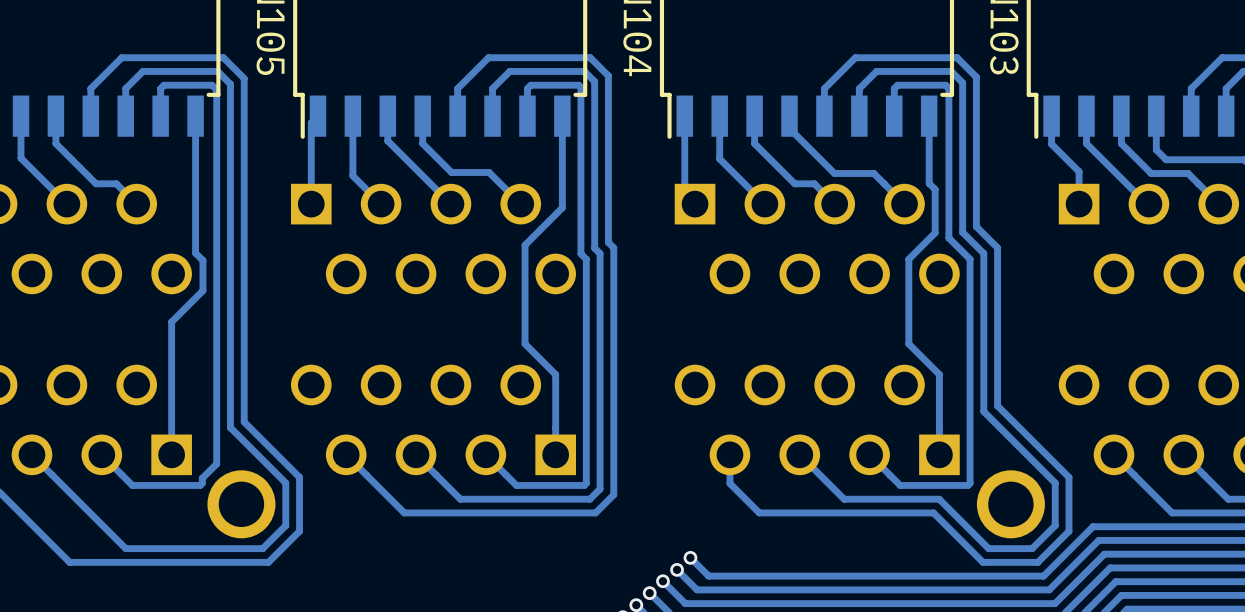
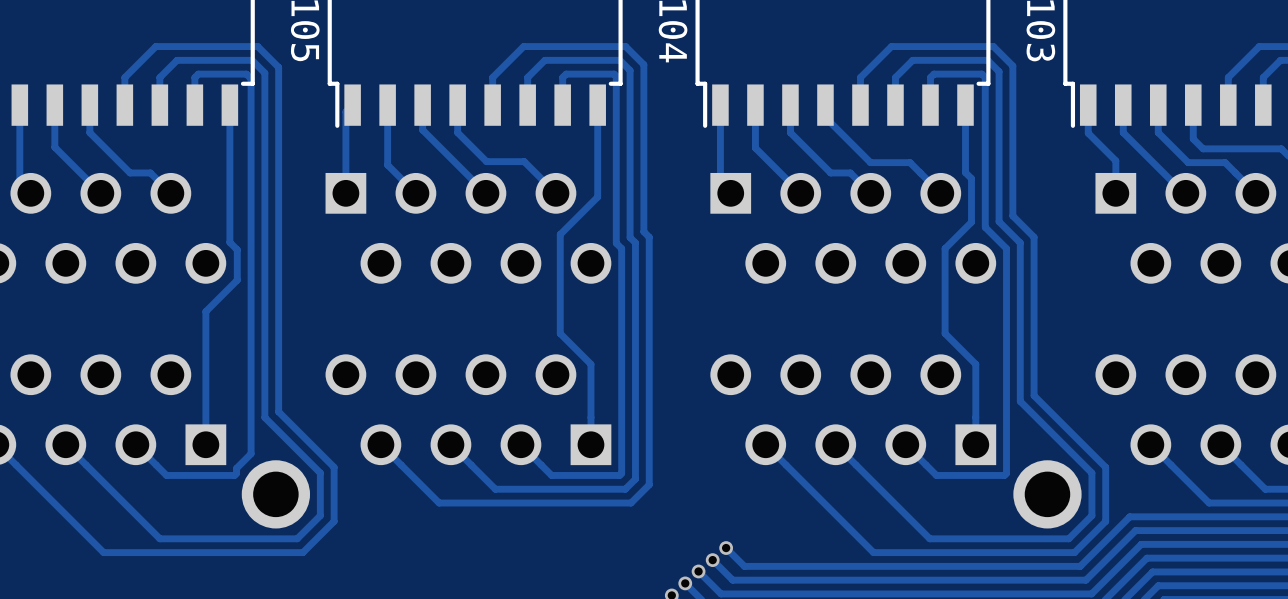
track: (729, 454) (729, 483) (759, 512) (933, 512) (983, 562) -> (765, 444) (873, 552) (1019, 552)
track: (844, 499) (939, 499) (988, 548) -> (880, 489) (929, 538) (1025, 538)

